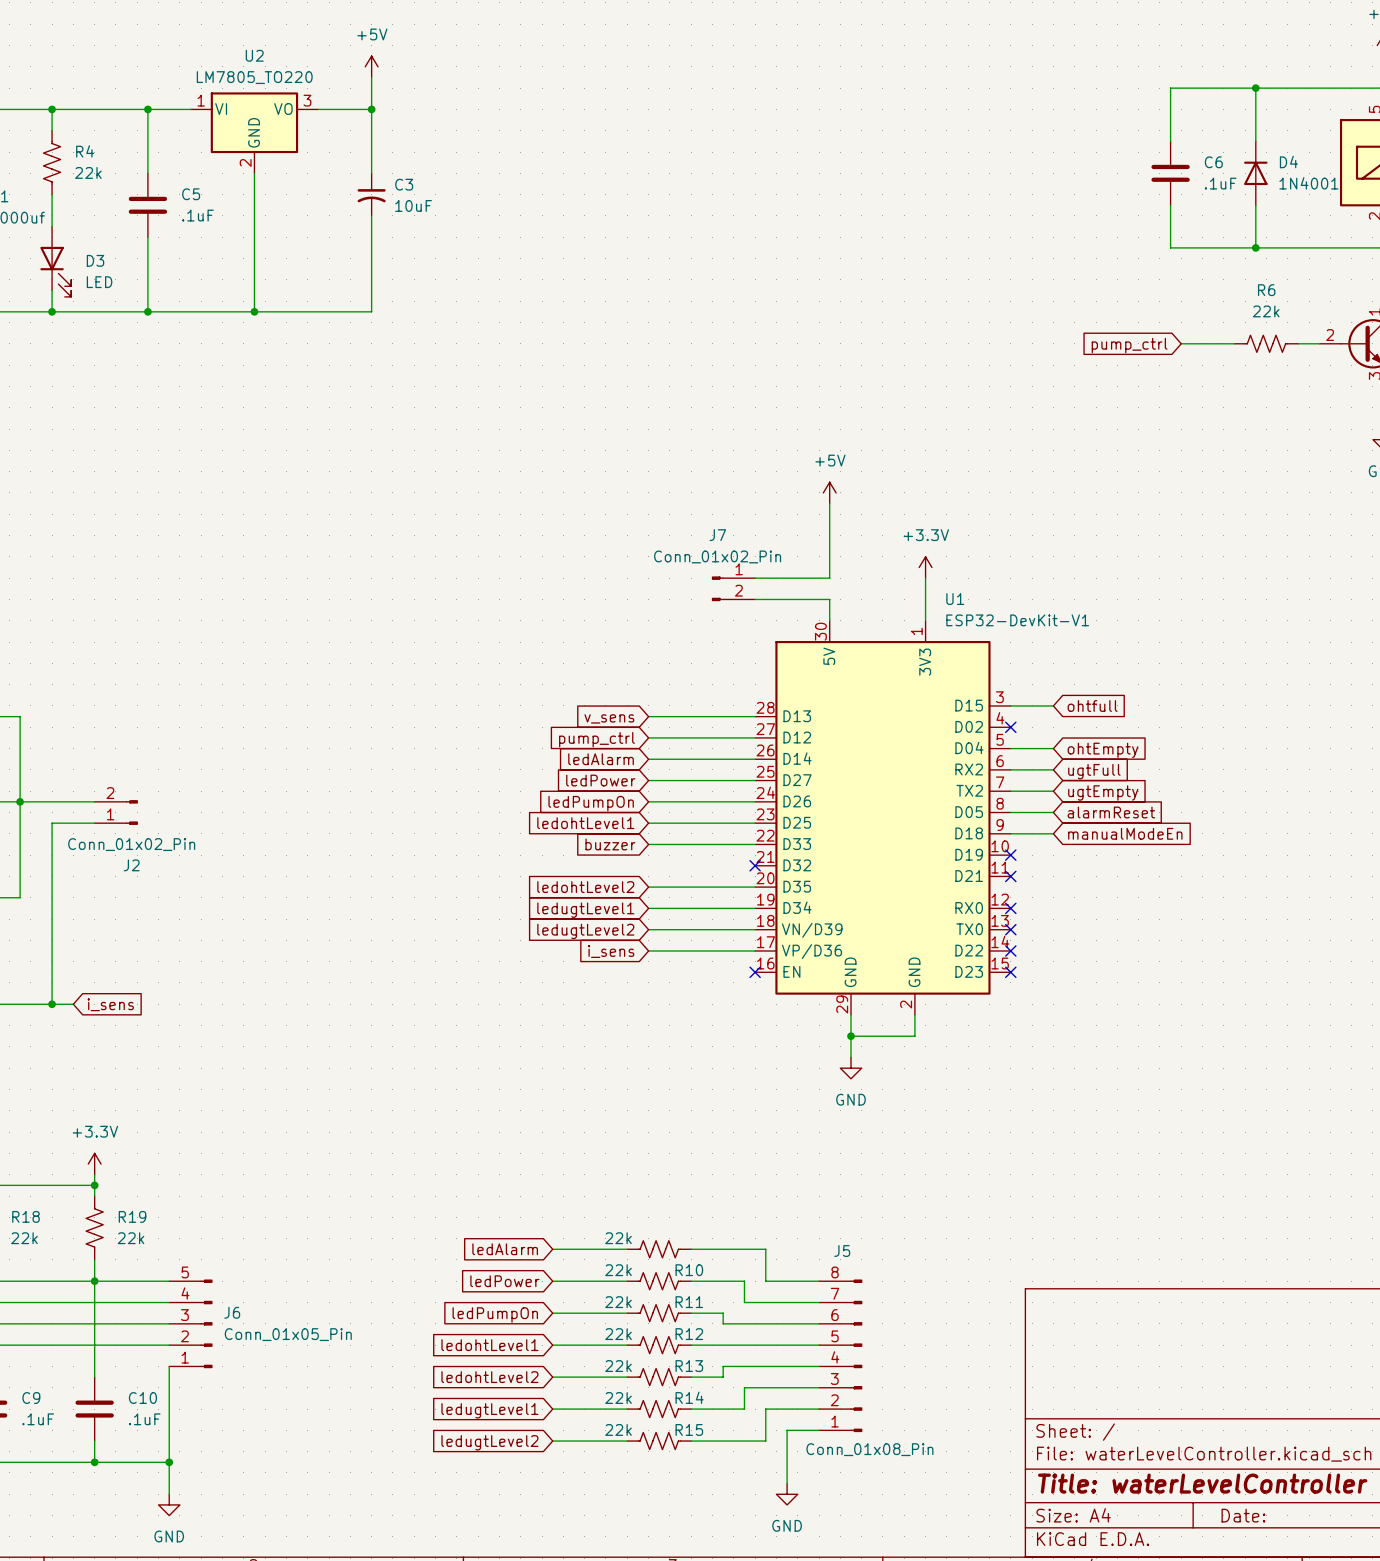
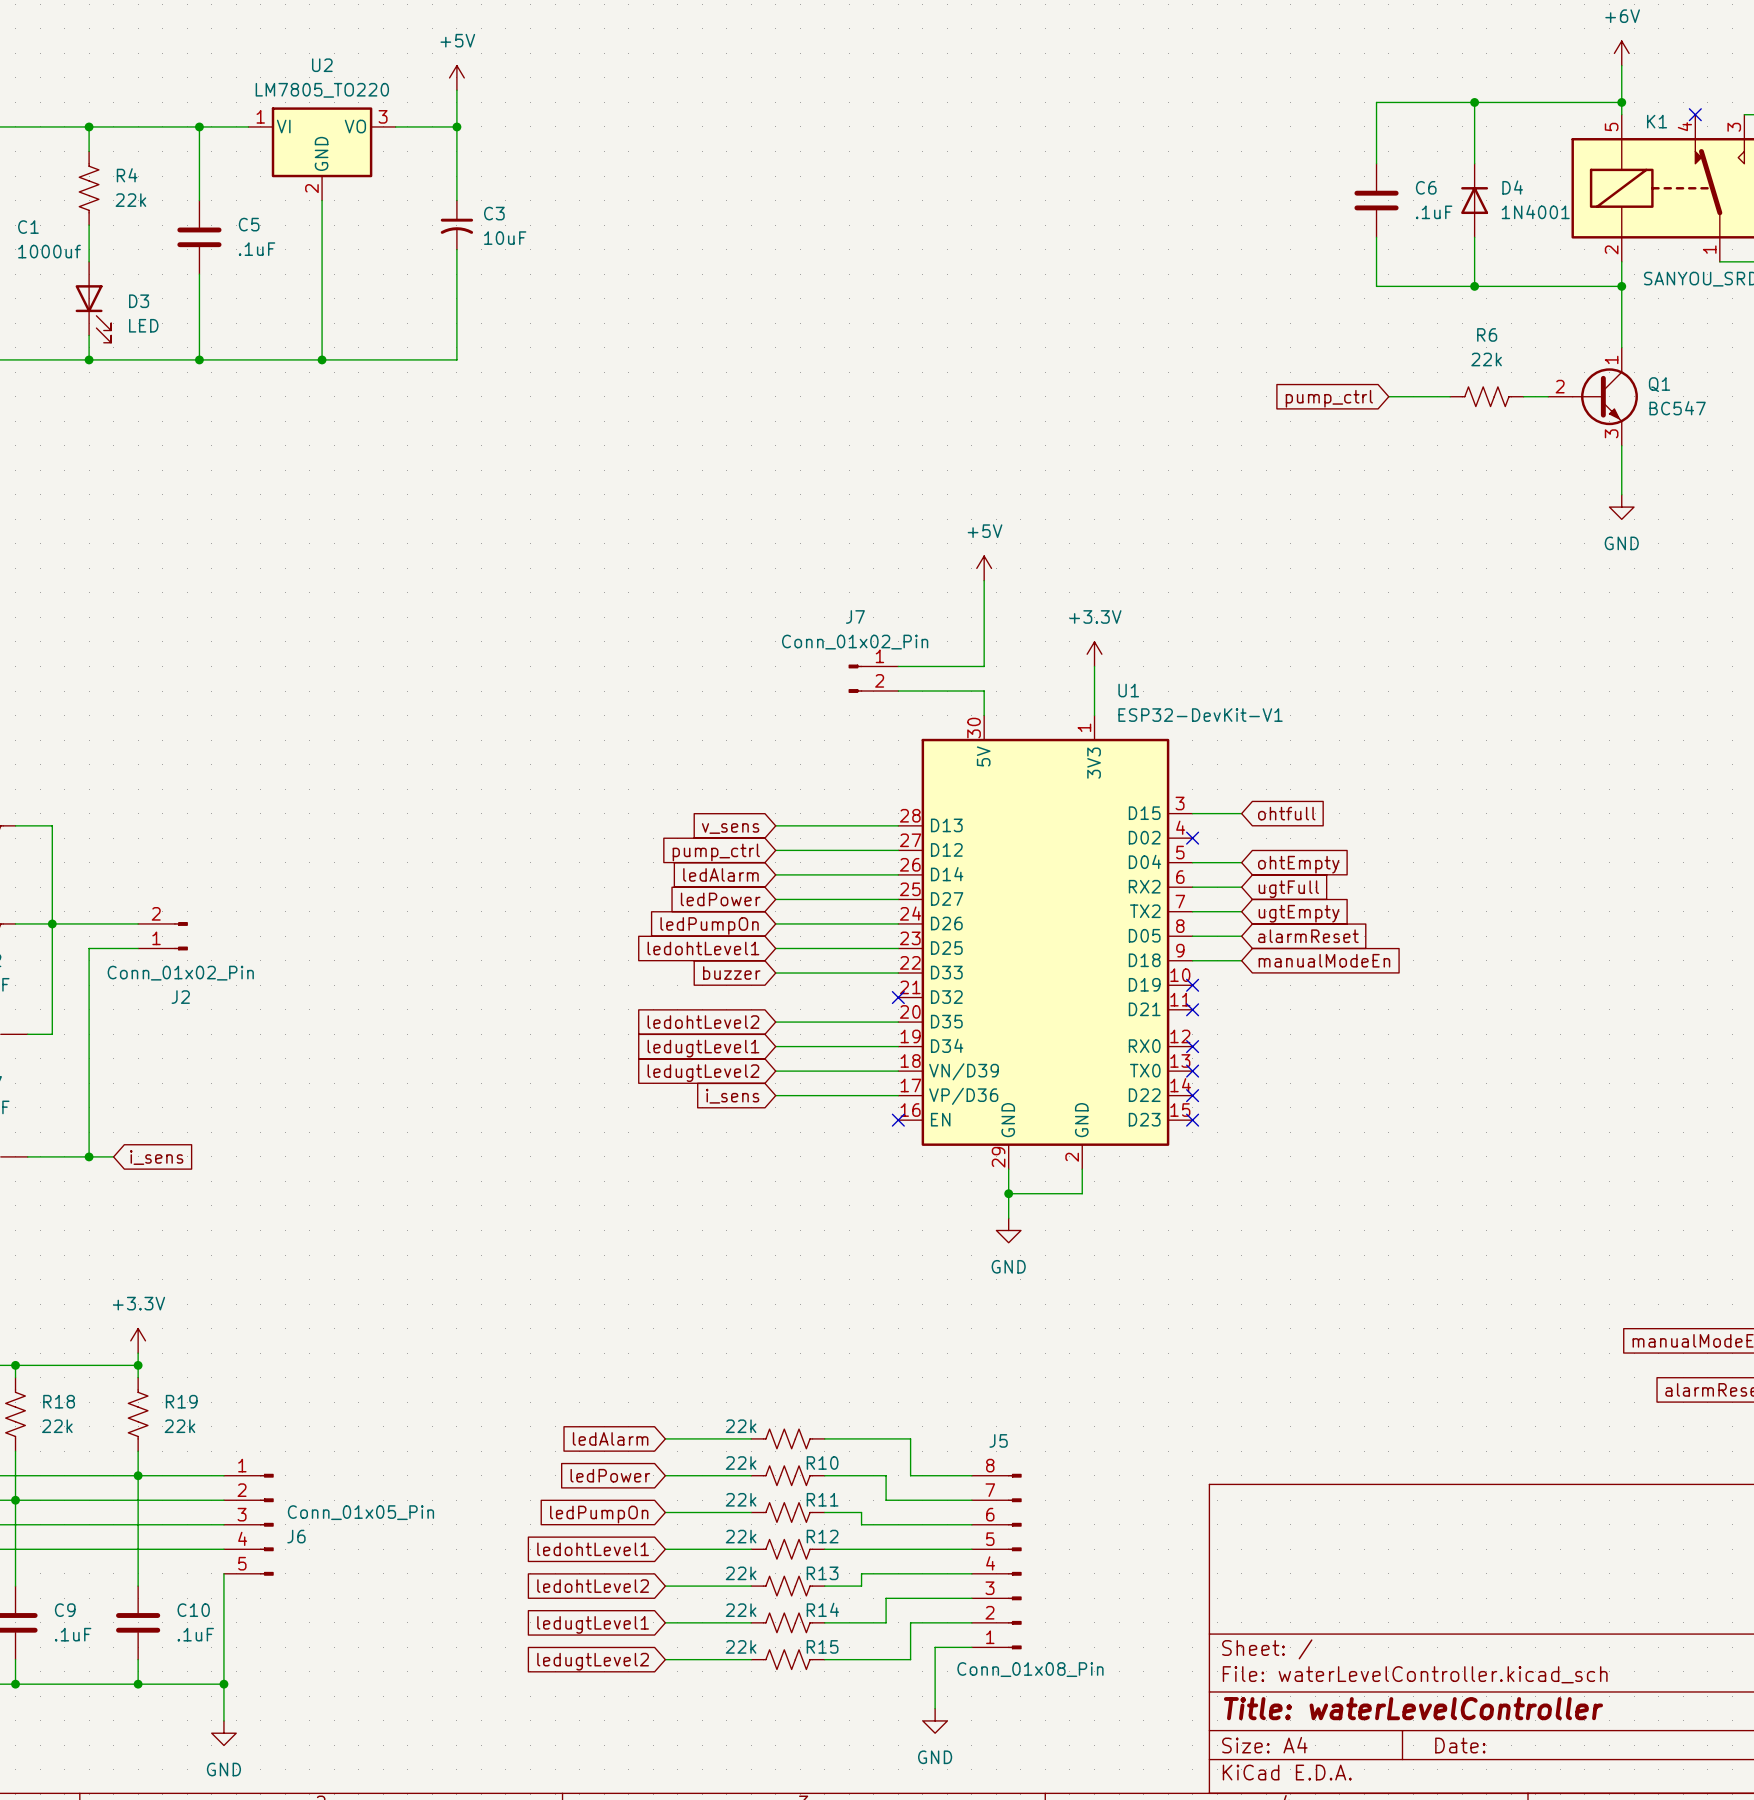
J6 flip: as is (206, 1323) -> up-down (266, 1524)

